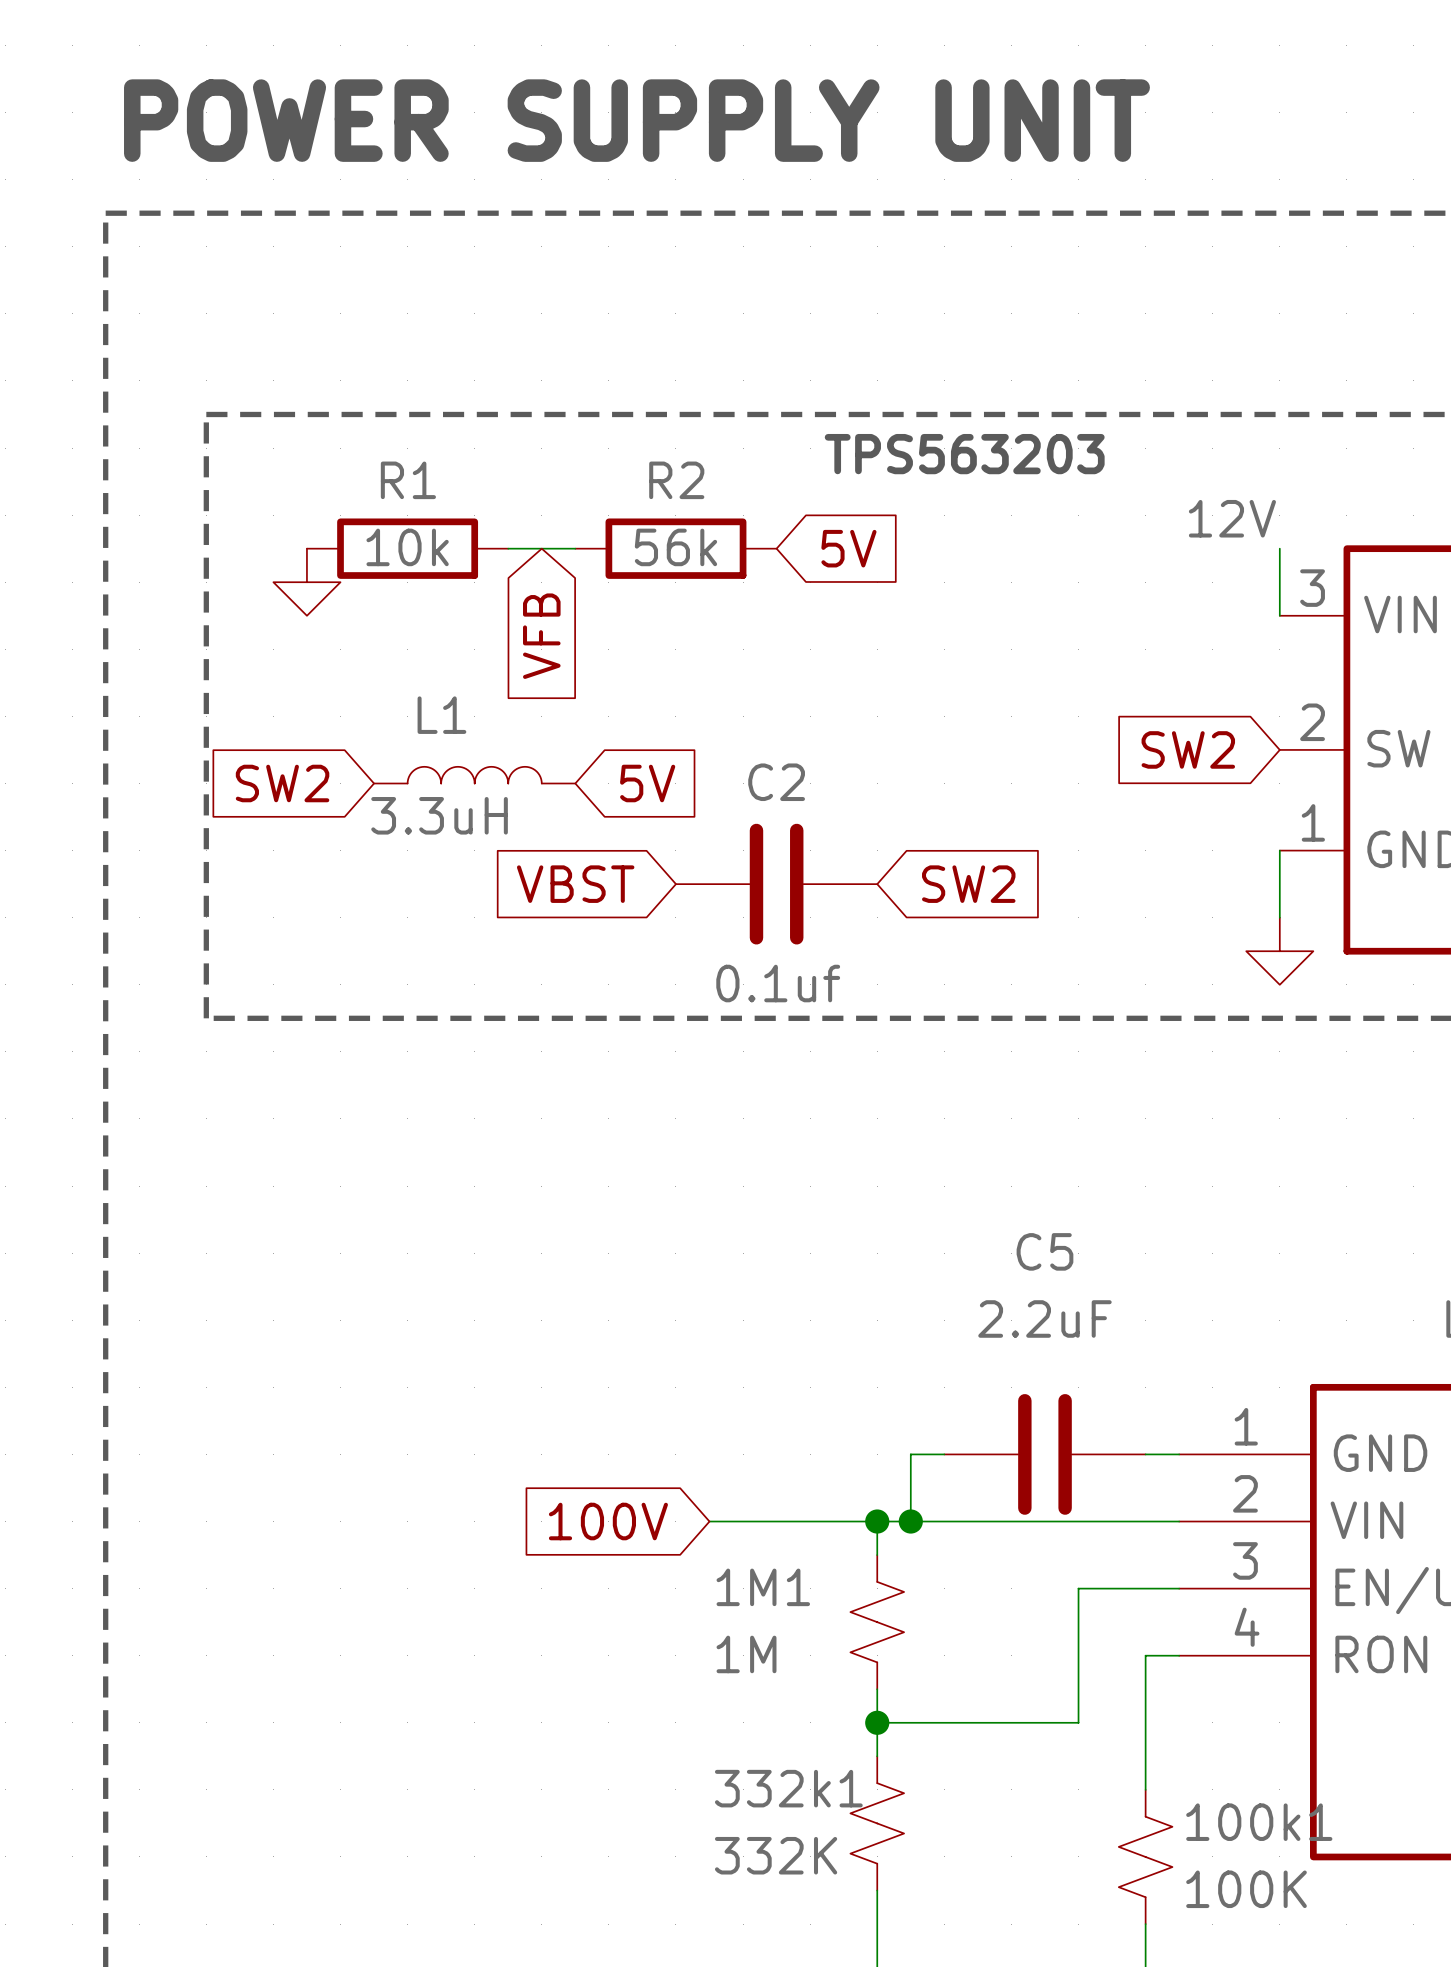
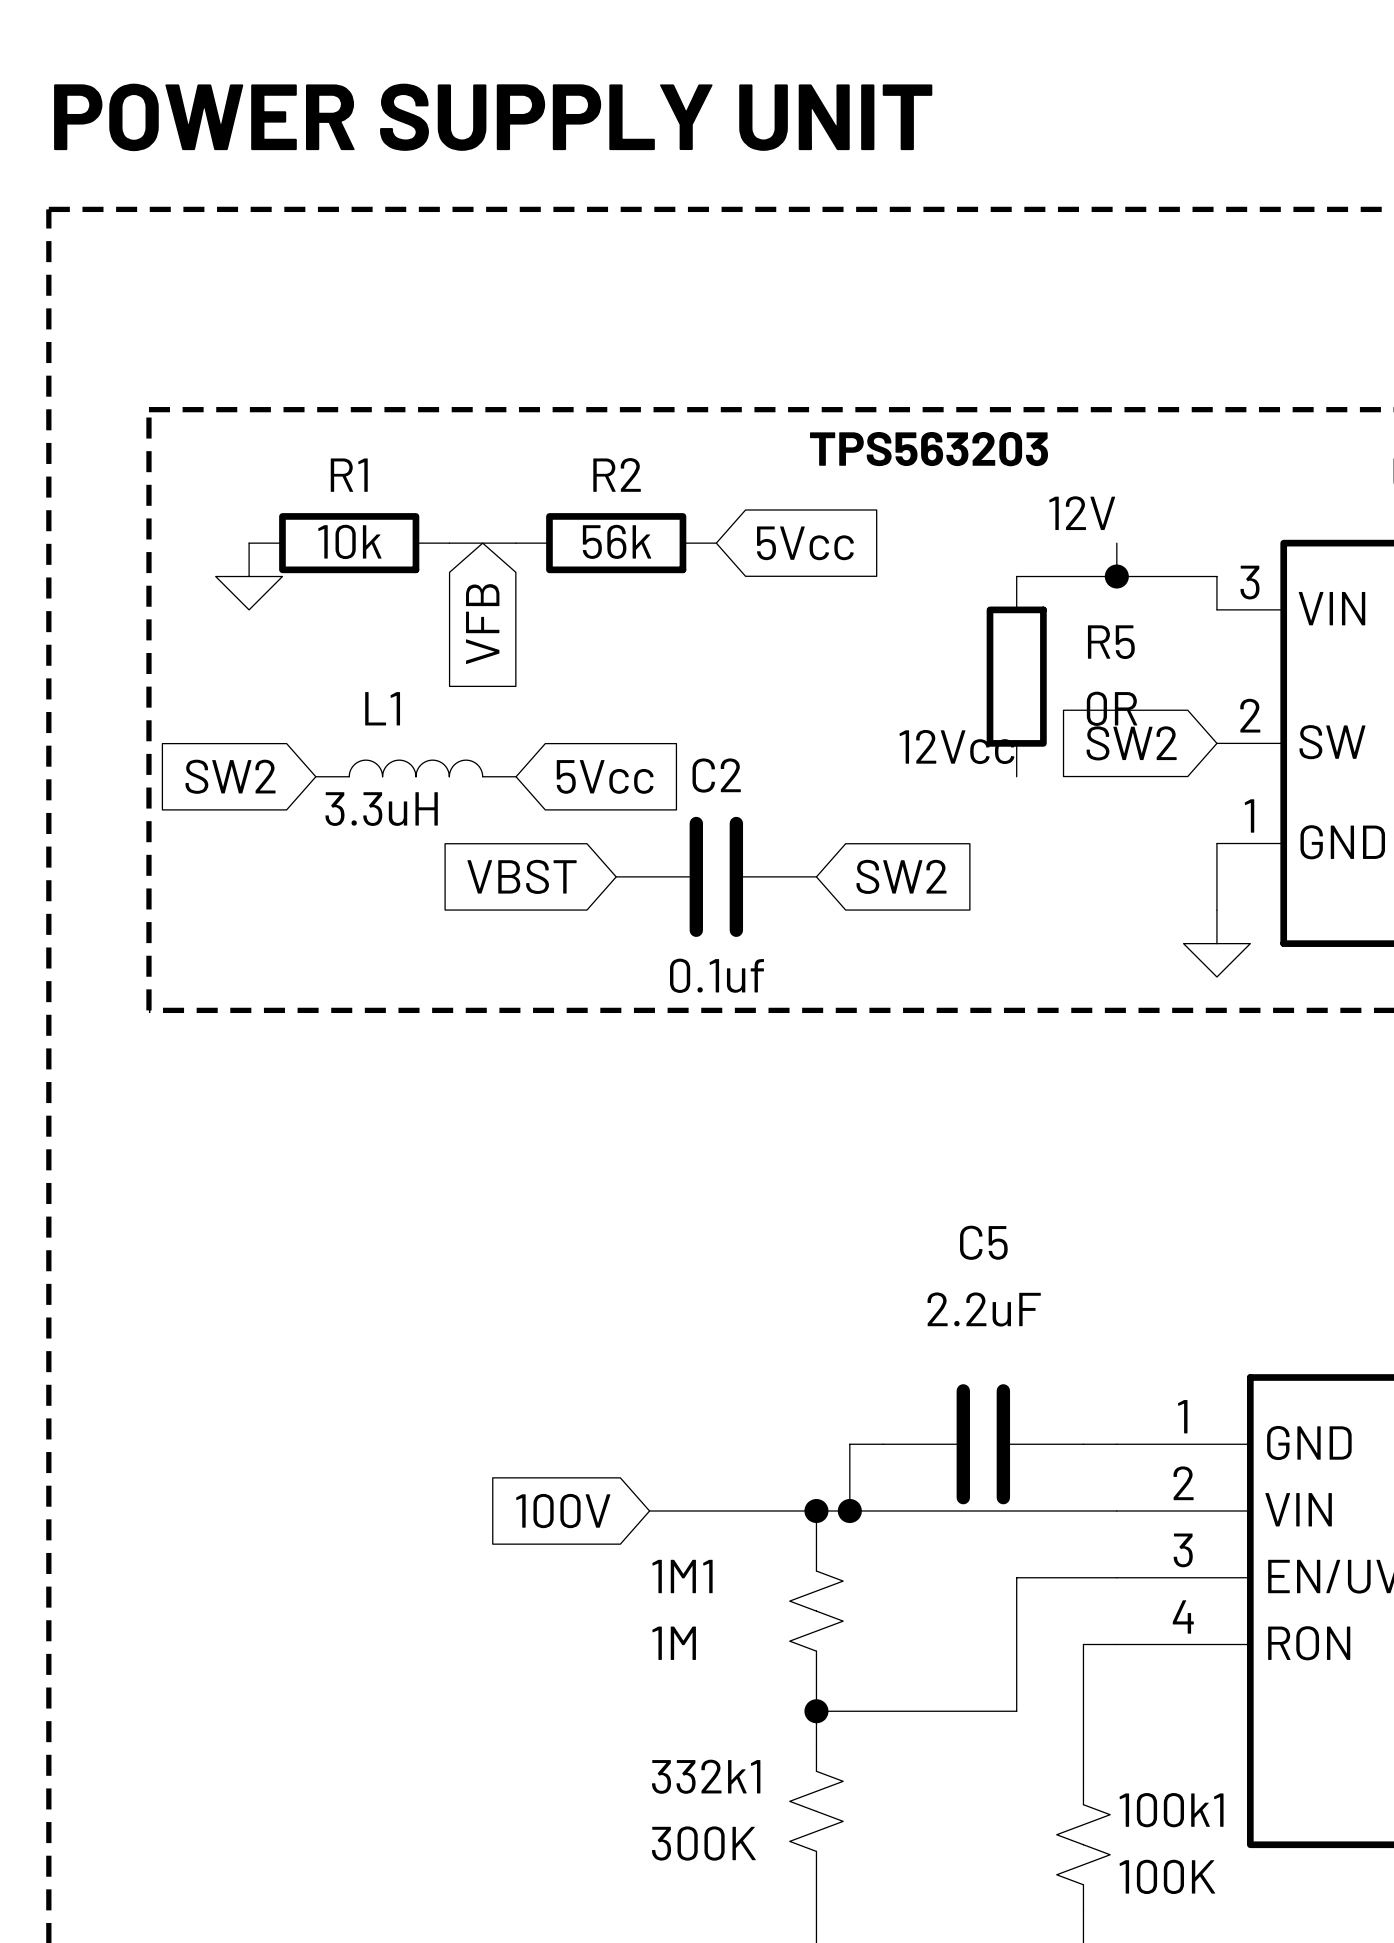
label position: 12V (1232, 518) -> 12V (1082, 513)
global label: 5V (848, 548) -> 5Vcc (805, 543)
wire: none -> (1116, 543) (1116, 576)
wire: (1279, 548) (1279, 582) -> (1016, 576) (1216, 576)
junction: none -> (1116, 576)
R5: none -> 0R (1016, 676)
label: none -> 12Vcc (957, 746)
global label: 5V (647, 783) -> 5Vcc (605, 776)
332k1 value: 332K (776, 1855) -> 300K (703, 1843)

